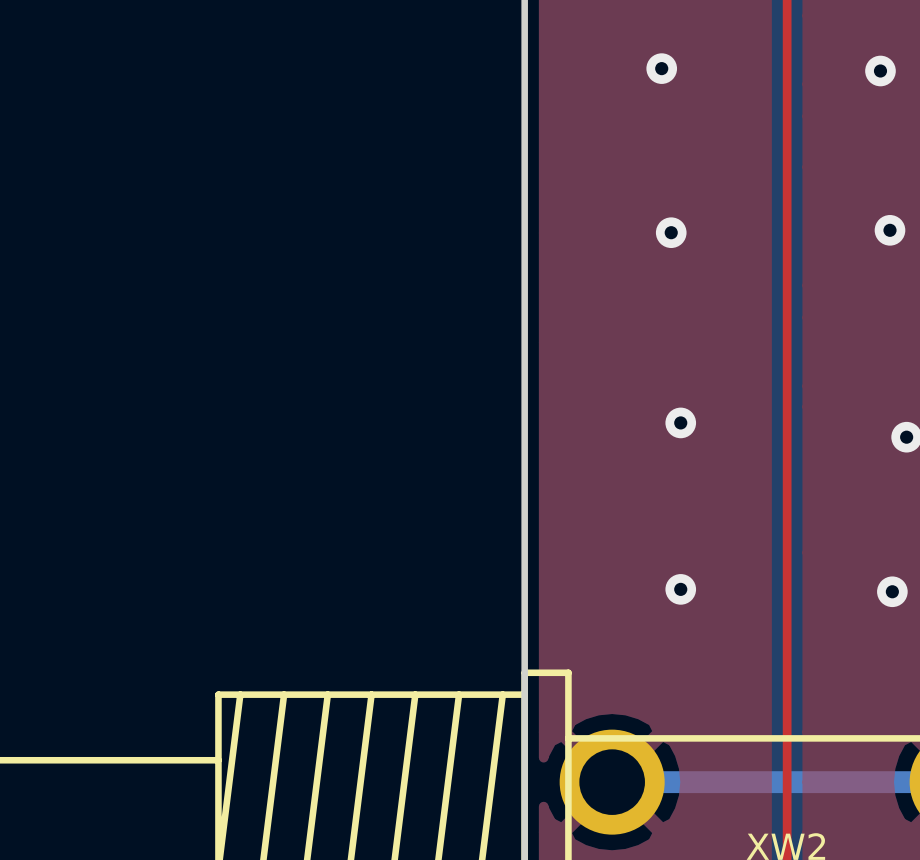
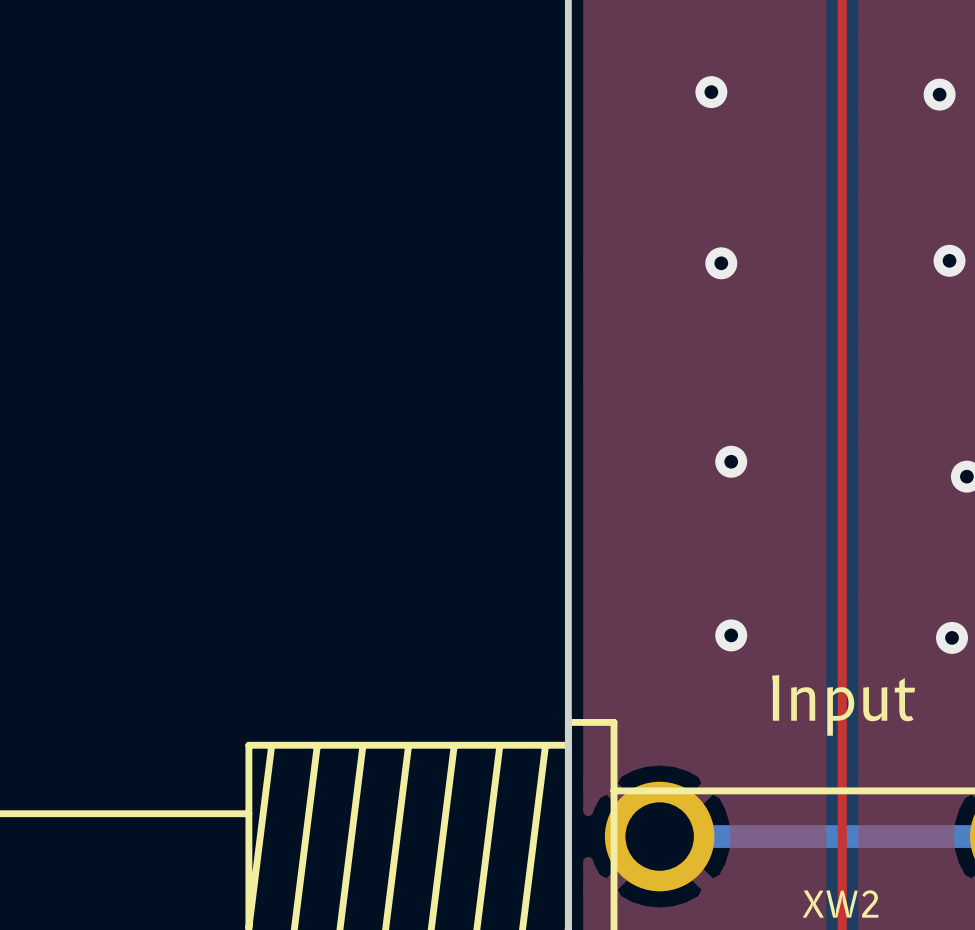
text: none -> Input (843, 705)

